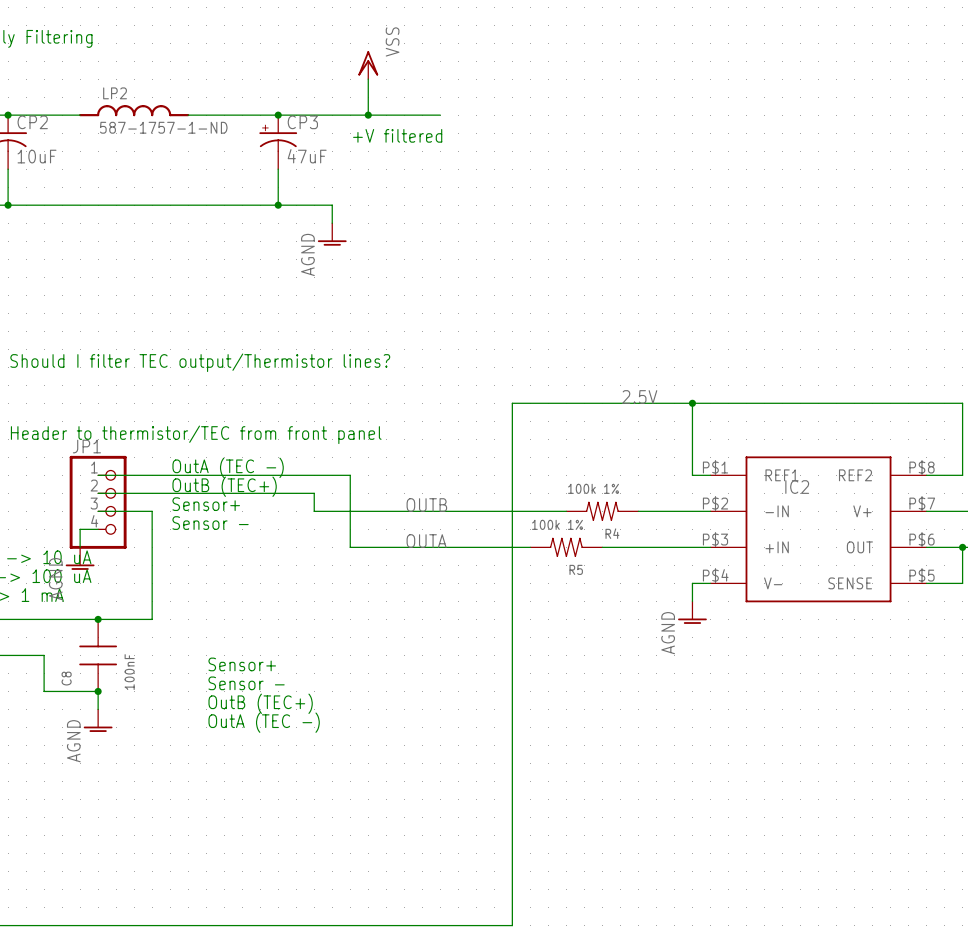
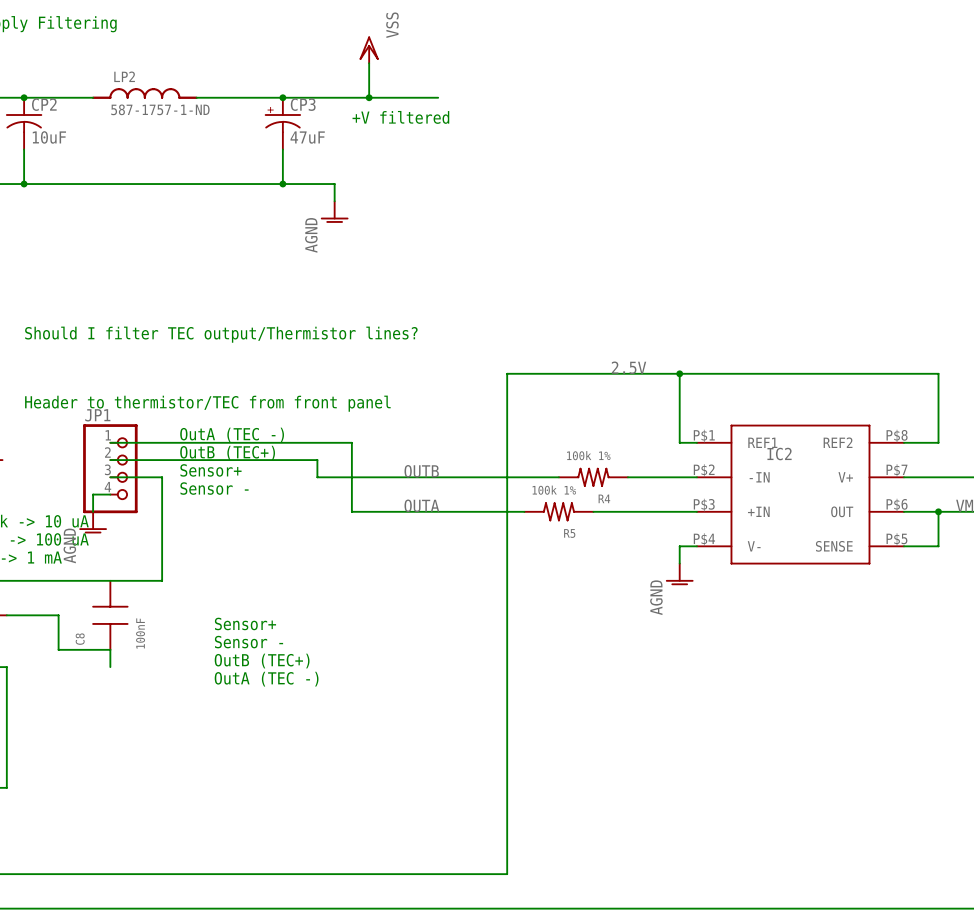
junction: (98, 619) -> none
junction: (98, 691) -> none
power symbol: AGND (98, 720) -> none

